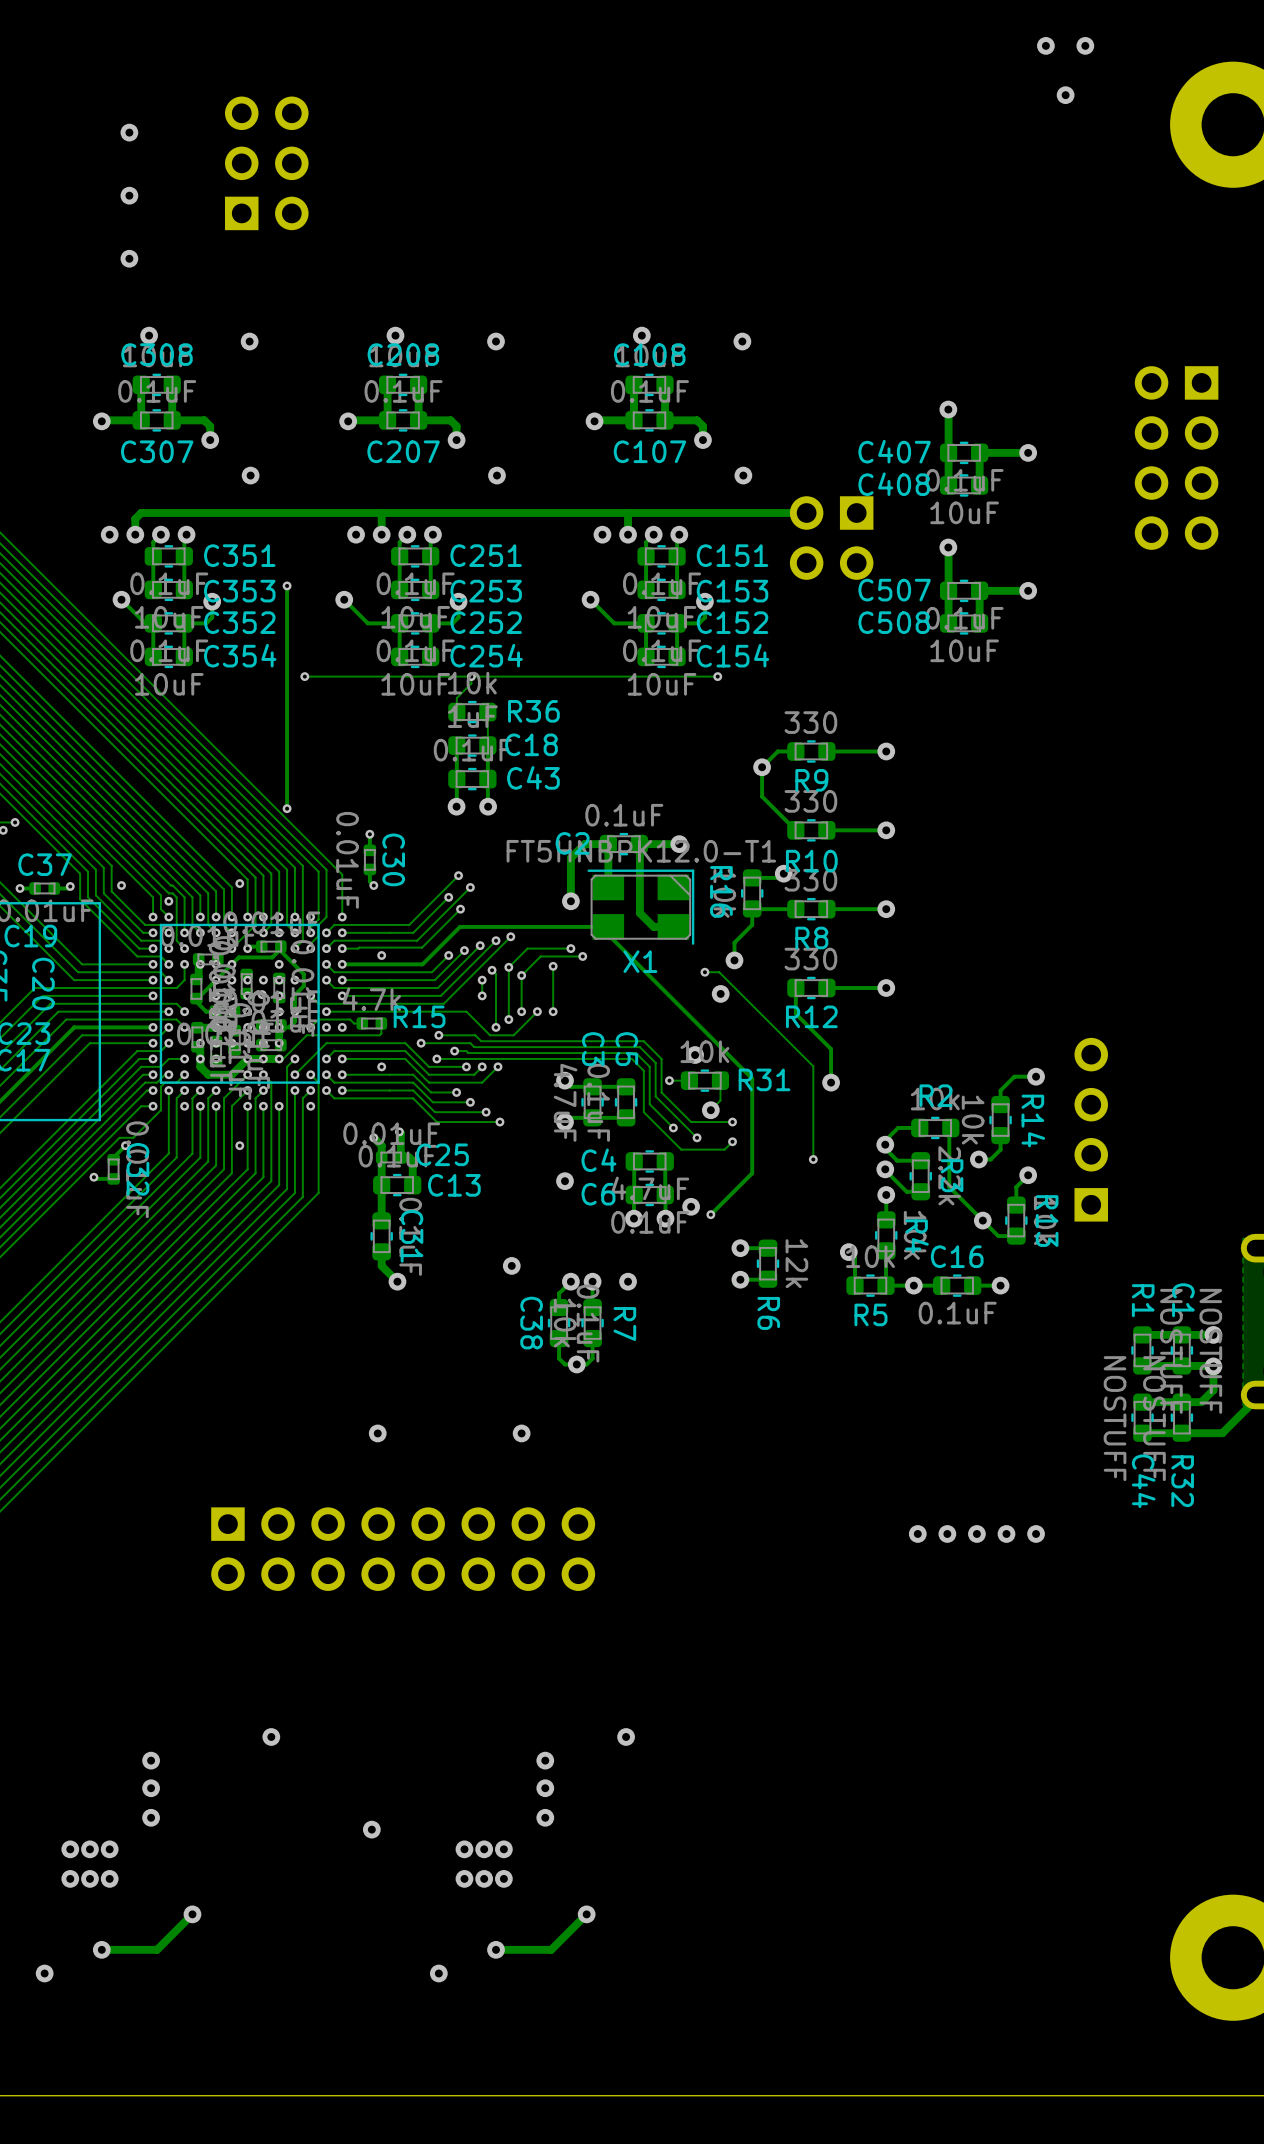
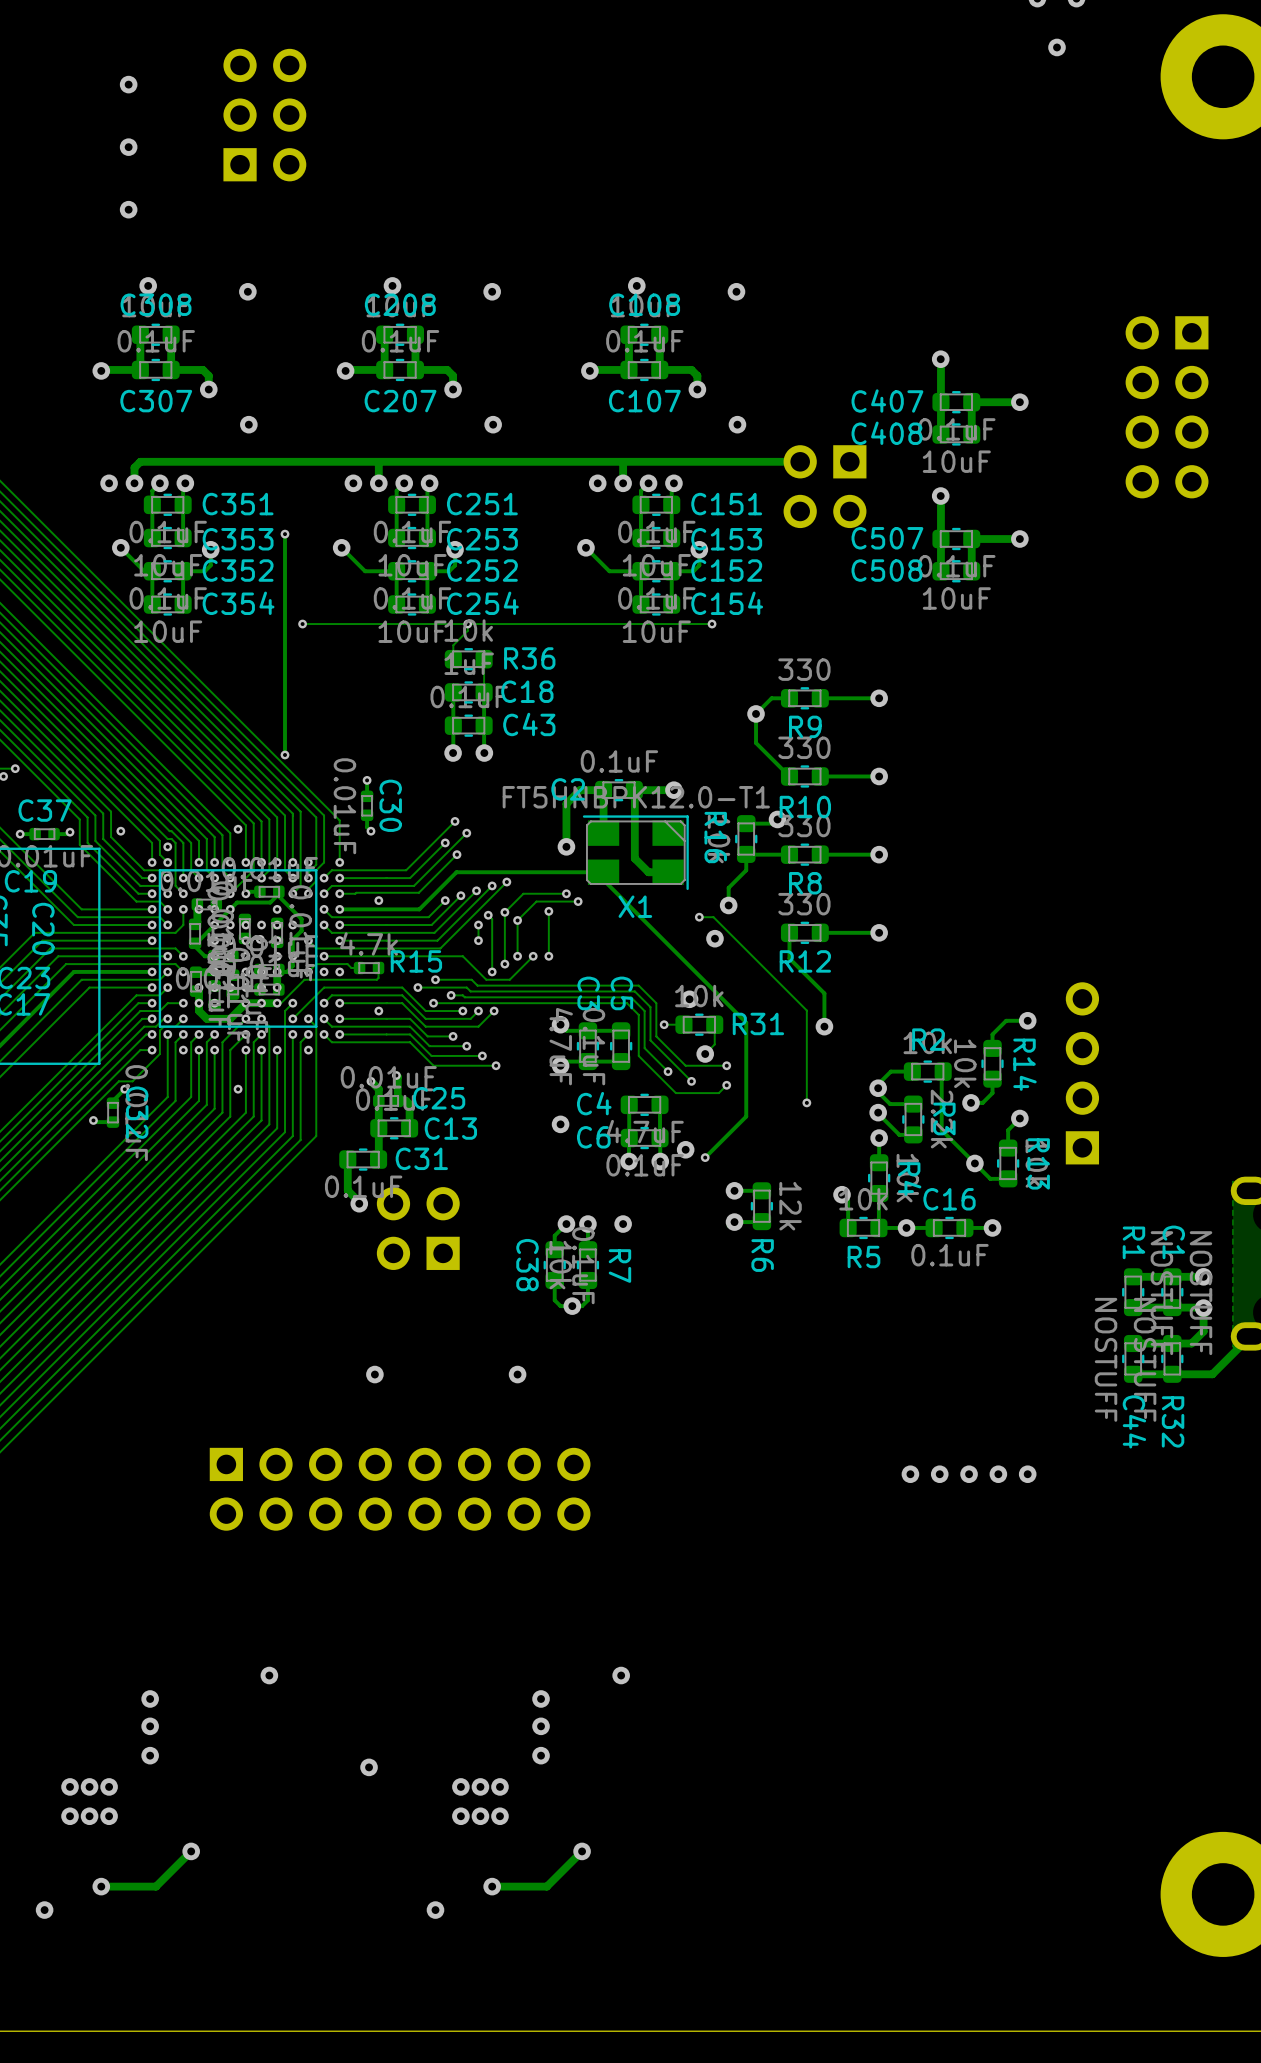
track: none -> (347, 1159) (347, 1190) (359, 1203)
C31 rotation: 0° (381, 1236) -> 90° clockwise (363, 1159)
track: (381, 1251) (381, 1265) (397, 1281) -> none
via: (511, 1265) -> none
via position: (397, 1281) -> (359, 1203)
part: none -> (418, 1228)

